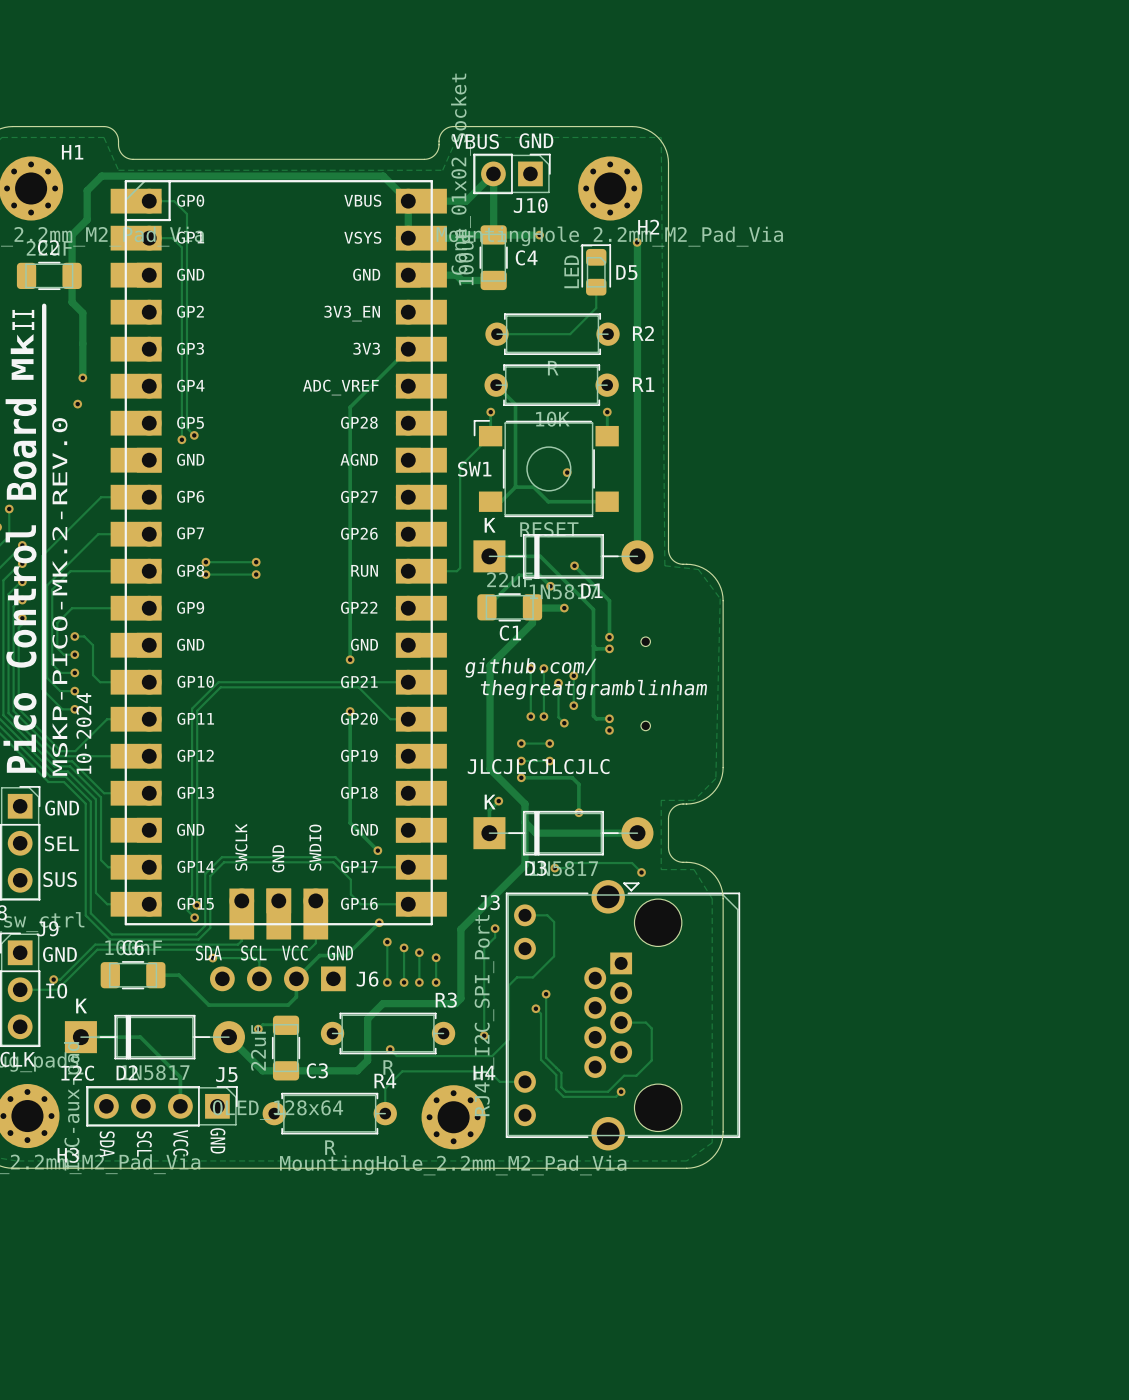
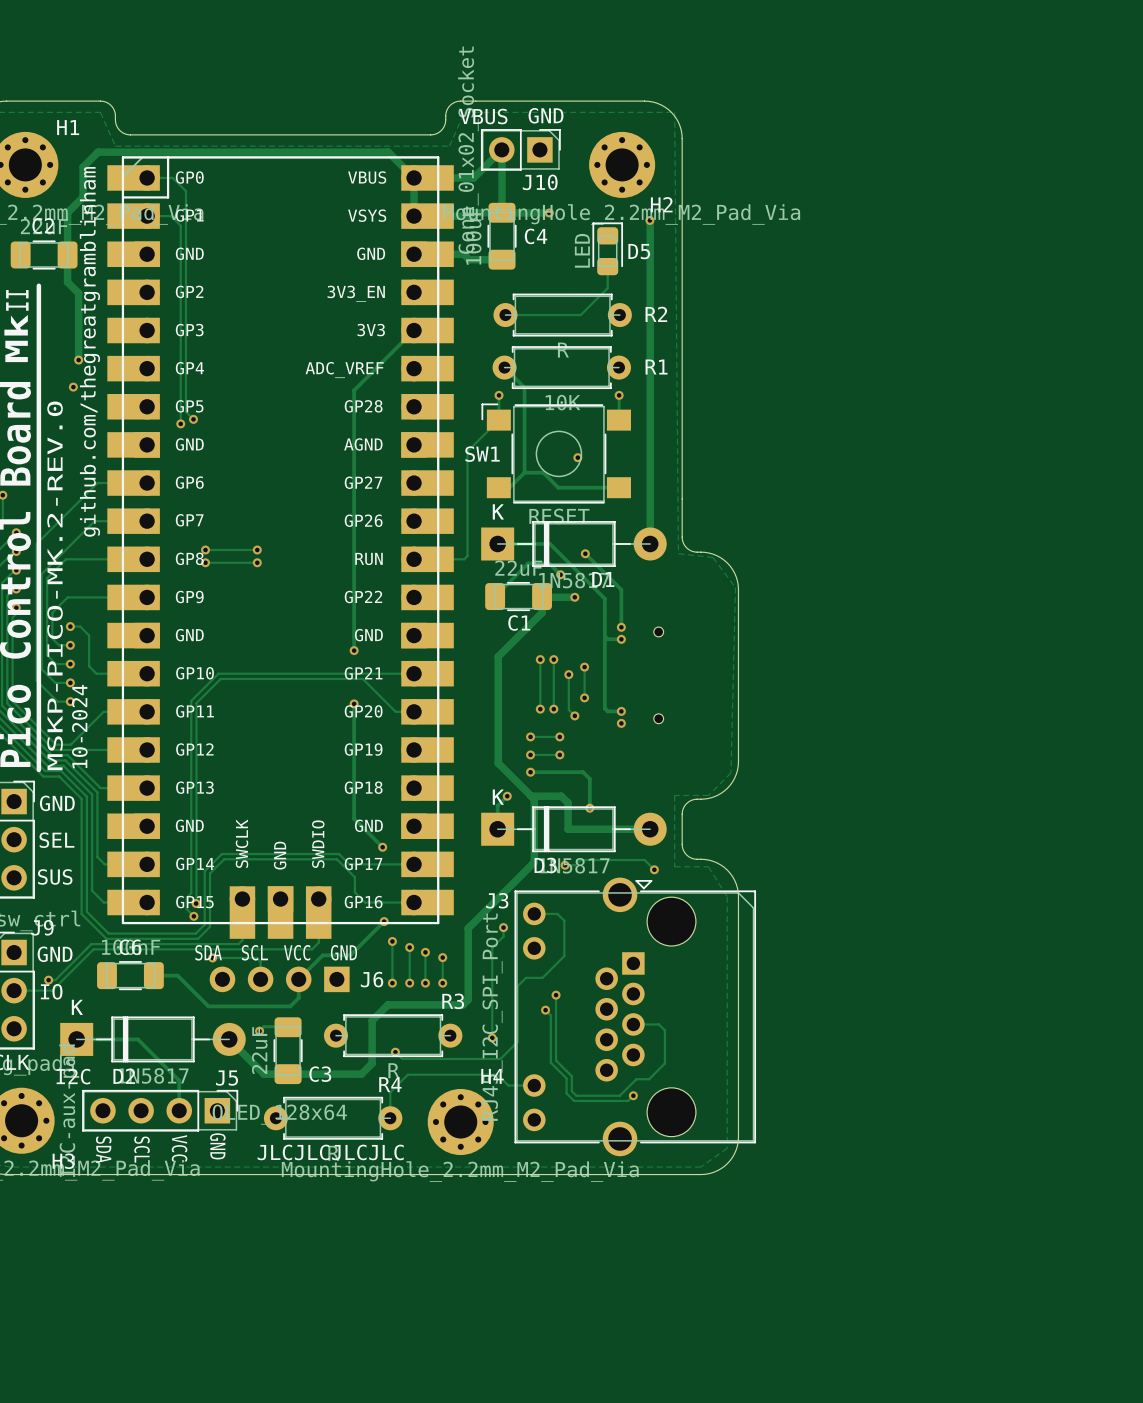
text: none -> github.com/thegreatgramblinham (89, 351)
text: github.com/ (530, 667) -> none
text: thegreatgramblinham (593, 689) -> none
text: JLCJLCJLCJLC (538, 766) -> none
track: (524, 822) (535, 833) (557, 833) -> (531, 796) (561, 796) (568, 802) (568, 829)
text: none -> JLCJLCJLCJLC (330, 1152)

